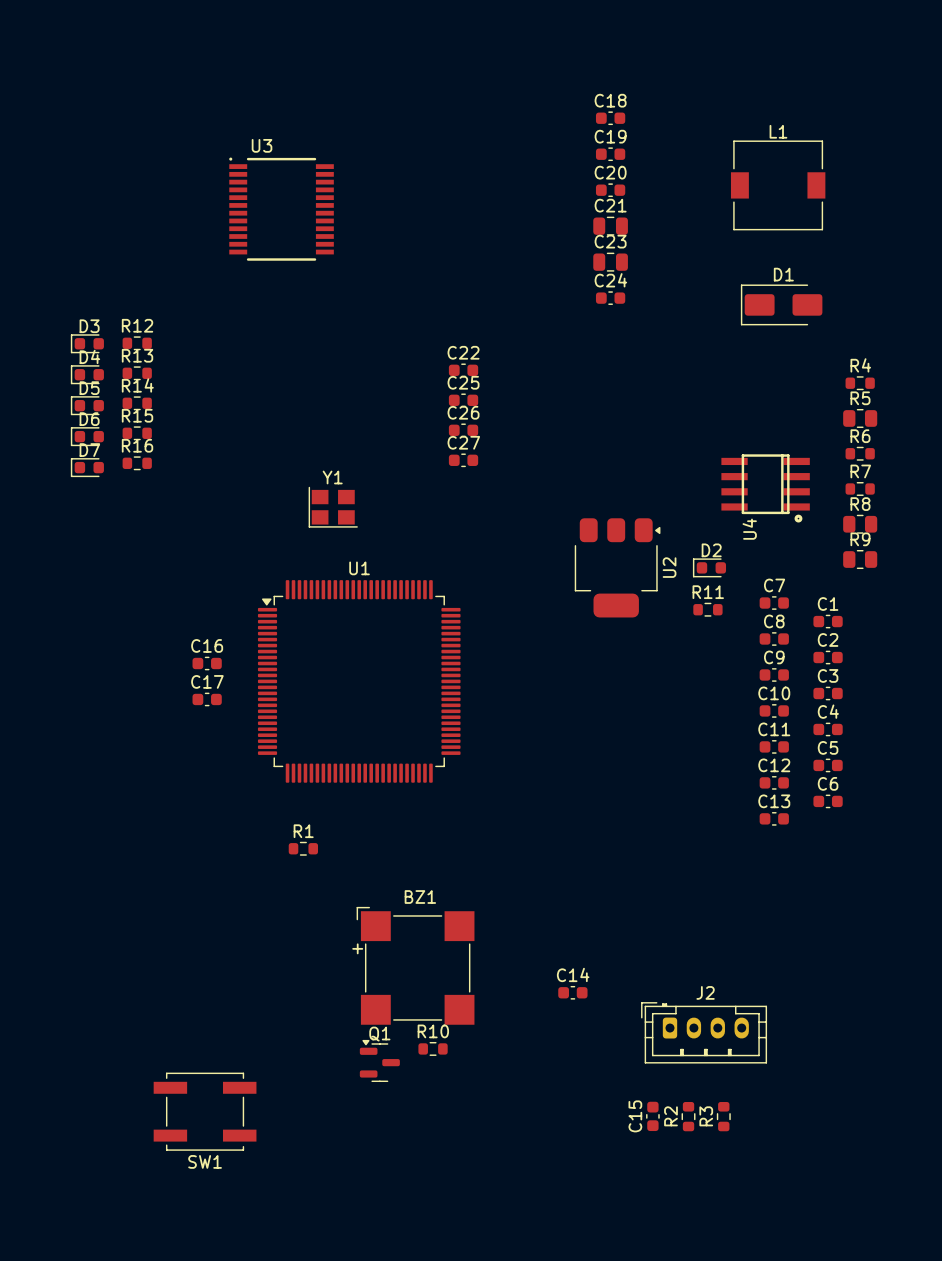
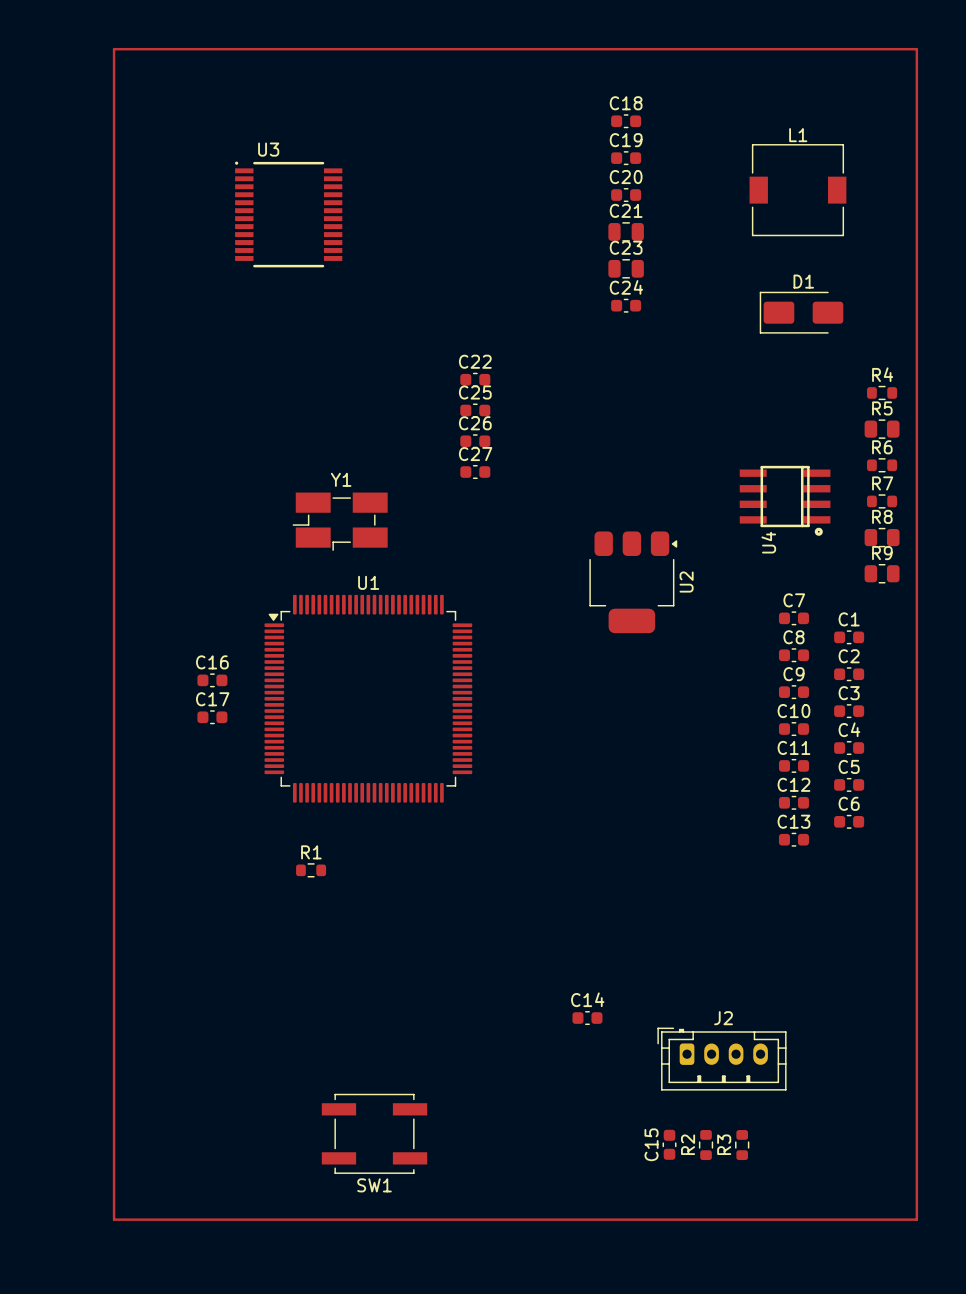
top track: none -> (114, 49) (916, 49) (916, 1219) (114, 1219) (114, 49)
D3: (87, 343) -> none
R12: (137, 343) -> none
R13: (137, 373) -> none
D4: (87, 374) -> none
R14: (137, 403) -> none
D5: (87, 405) -> none
R15: (137, 433) -> none
D6: (87, 436) -> none
R16: (137, 463) -> none
D7: (87, 467) -> none
Y1 footprint: [308, 486, 358, 528] -> [292, 492, 388, 551]
D2: (709, 567) -> none
R11: (707, 609) -> none
BZ1: (415, 965) -> none
R10: (433, 1048) -> none
Q1: (379, 1060) -> none
SW1 position: (205, 1111) -> (374, 1133)

